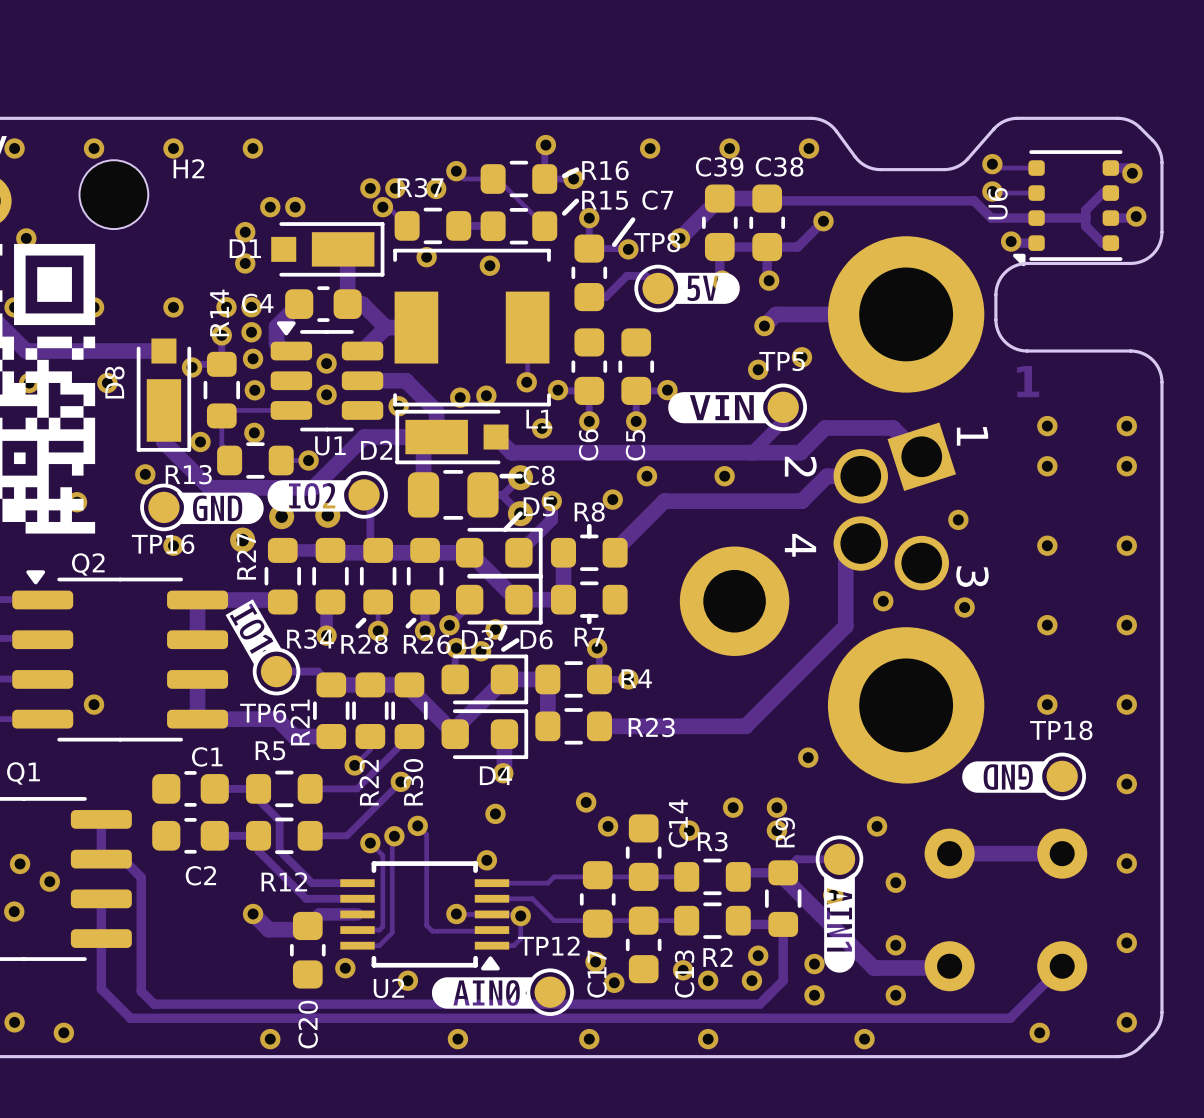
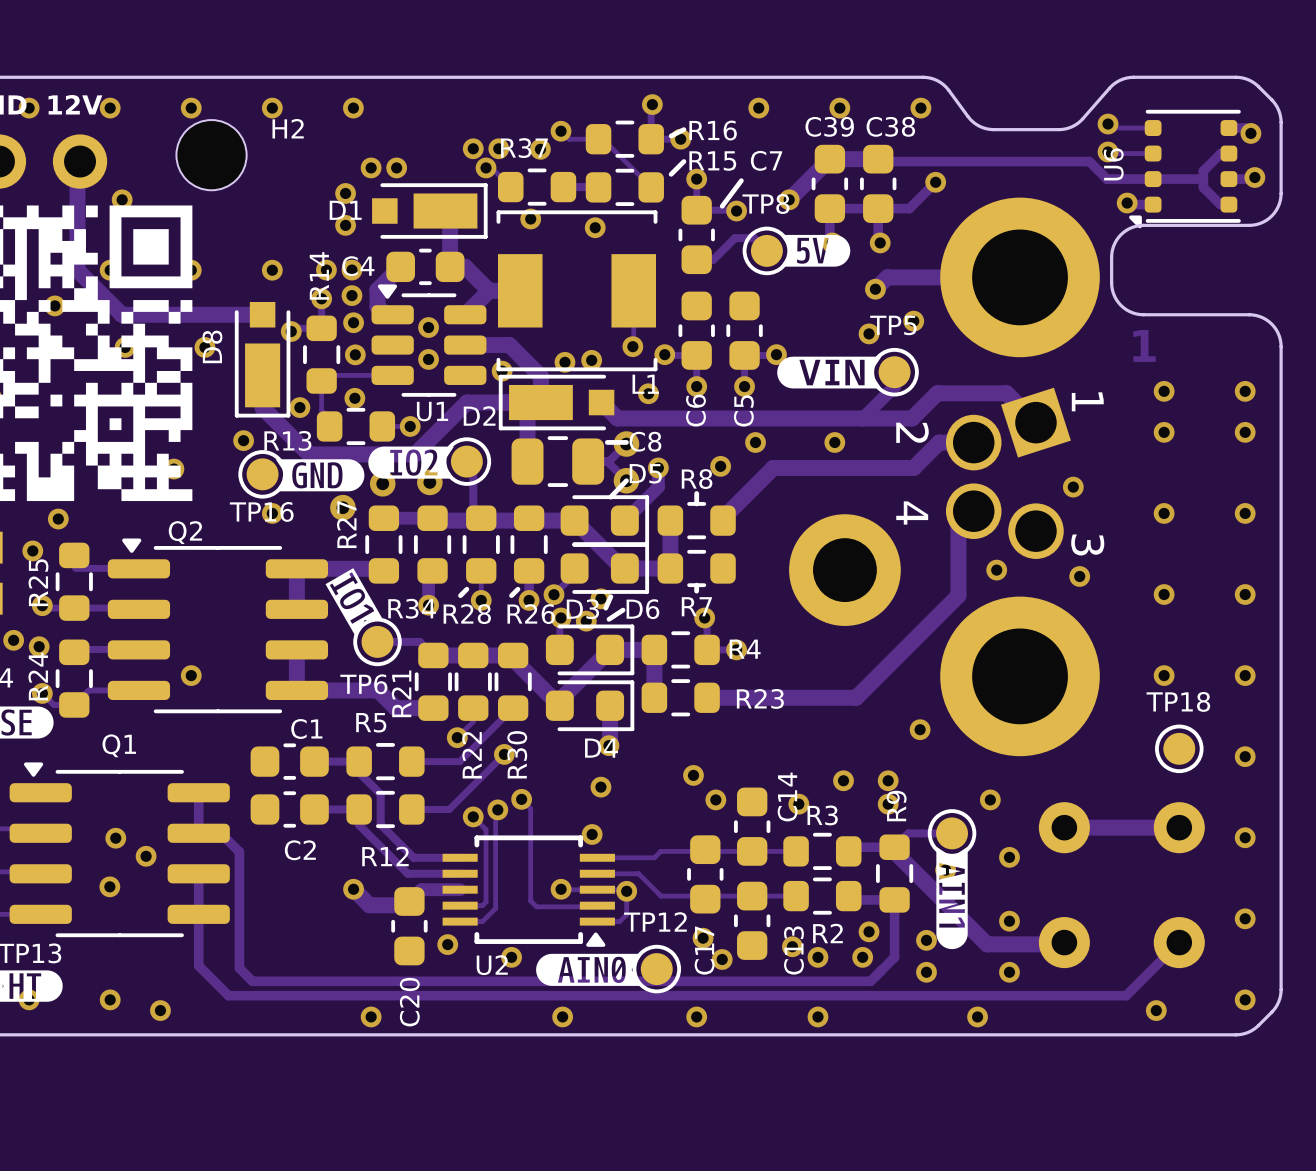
drawing: [962, 761, 1050, 793] -> none

